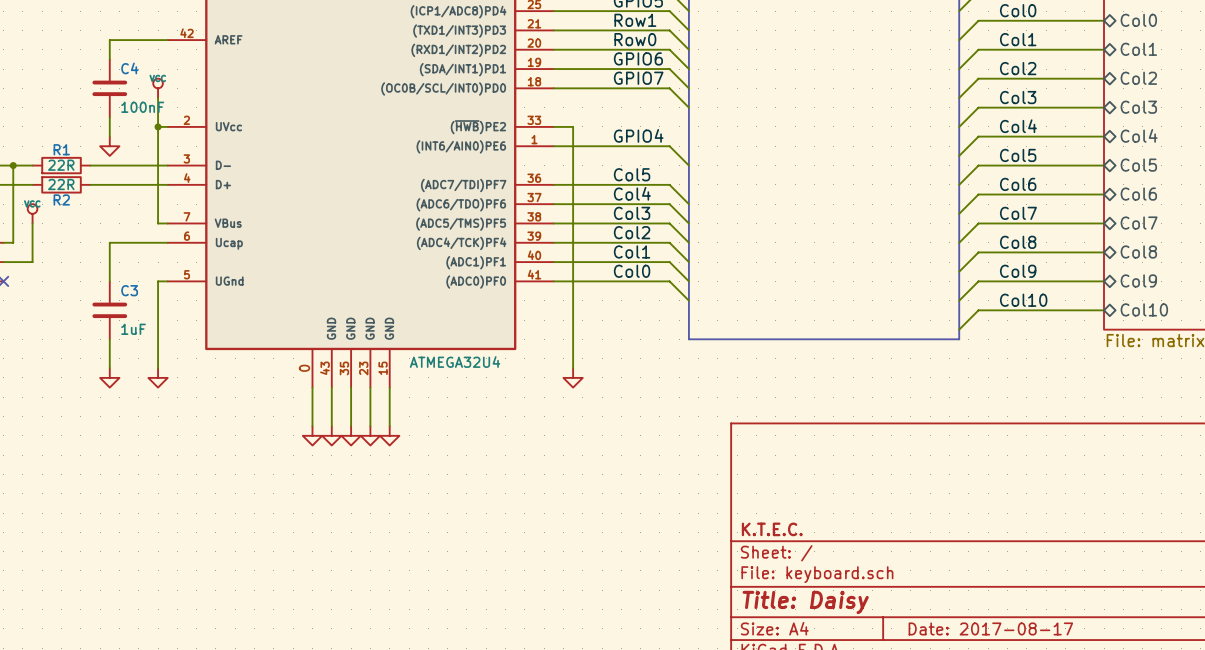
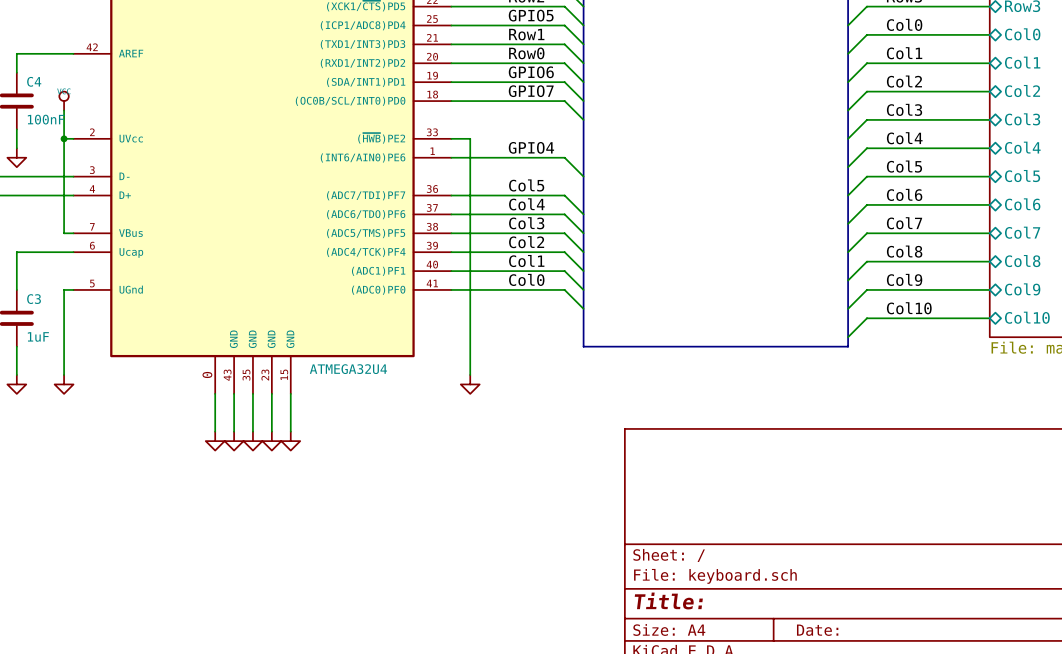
title block: K.T.E.C. (772, 529) -> none
title block: Title: Daisy (805, 602) -> Title: (668, 601)
title block: Date: 2017-08-17 (990, 628) -> Date: (817, 630)

